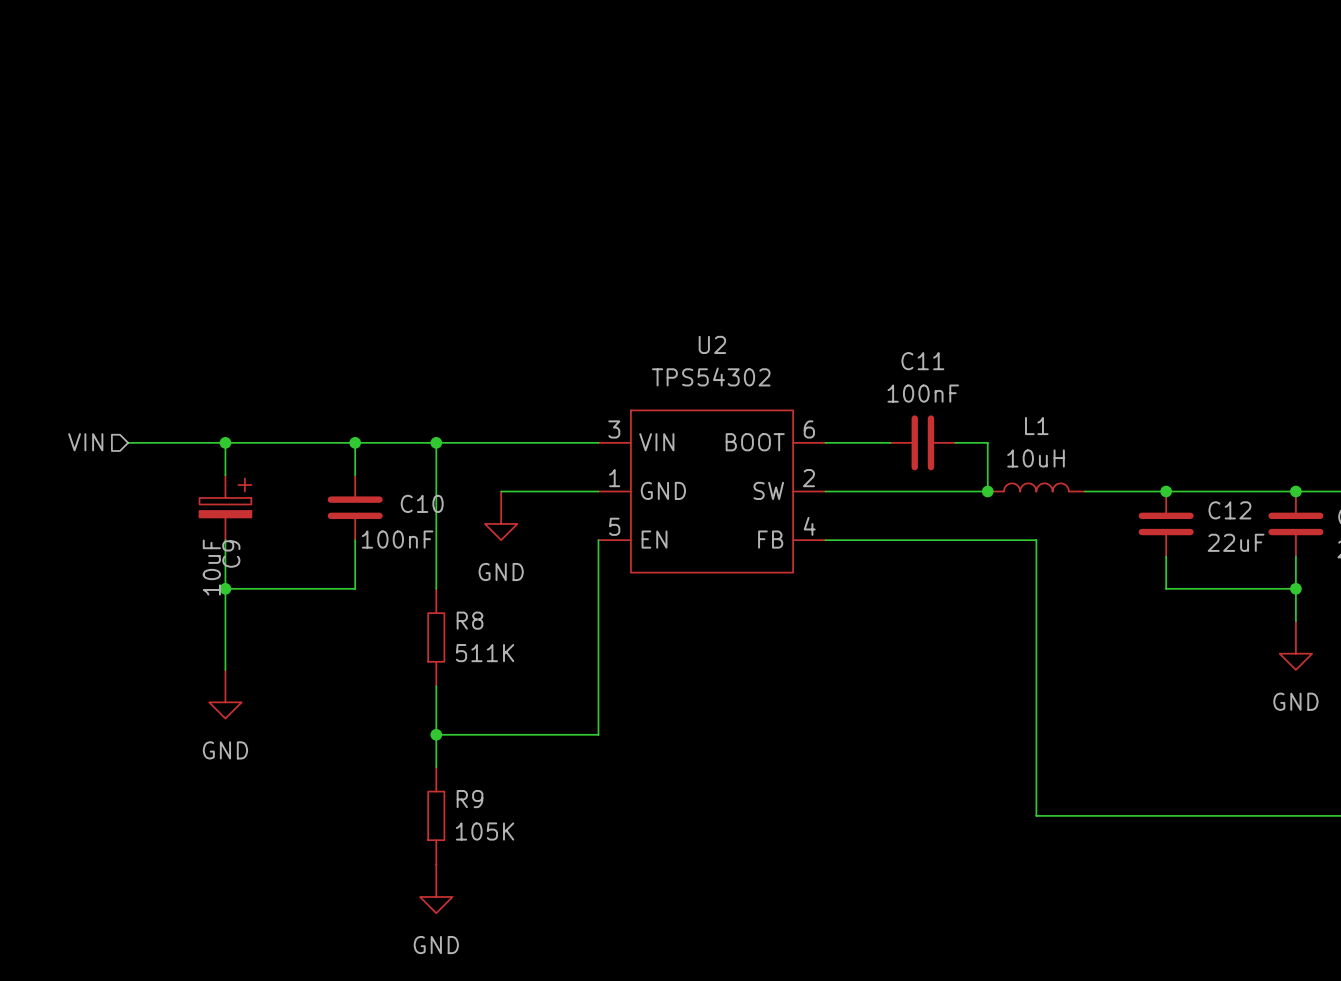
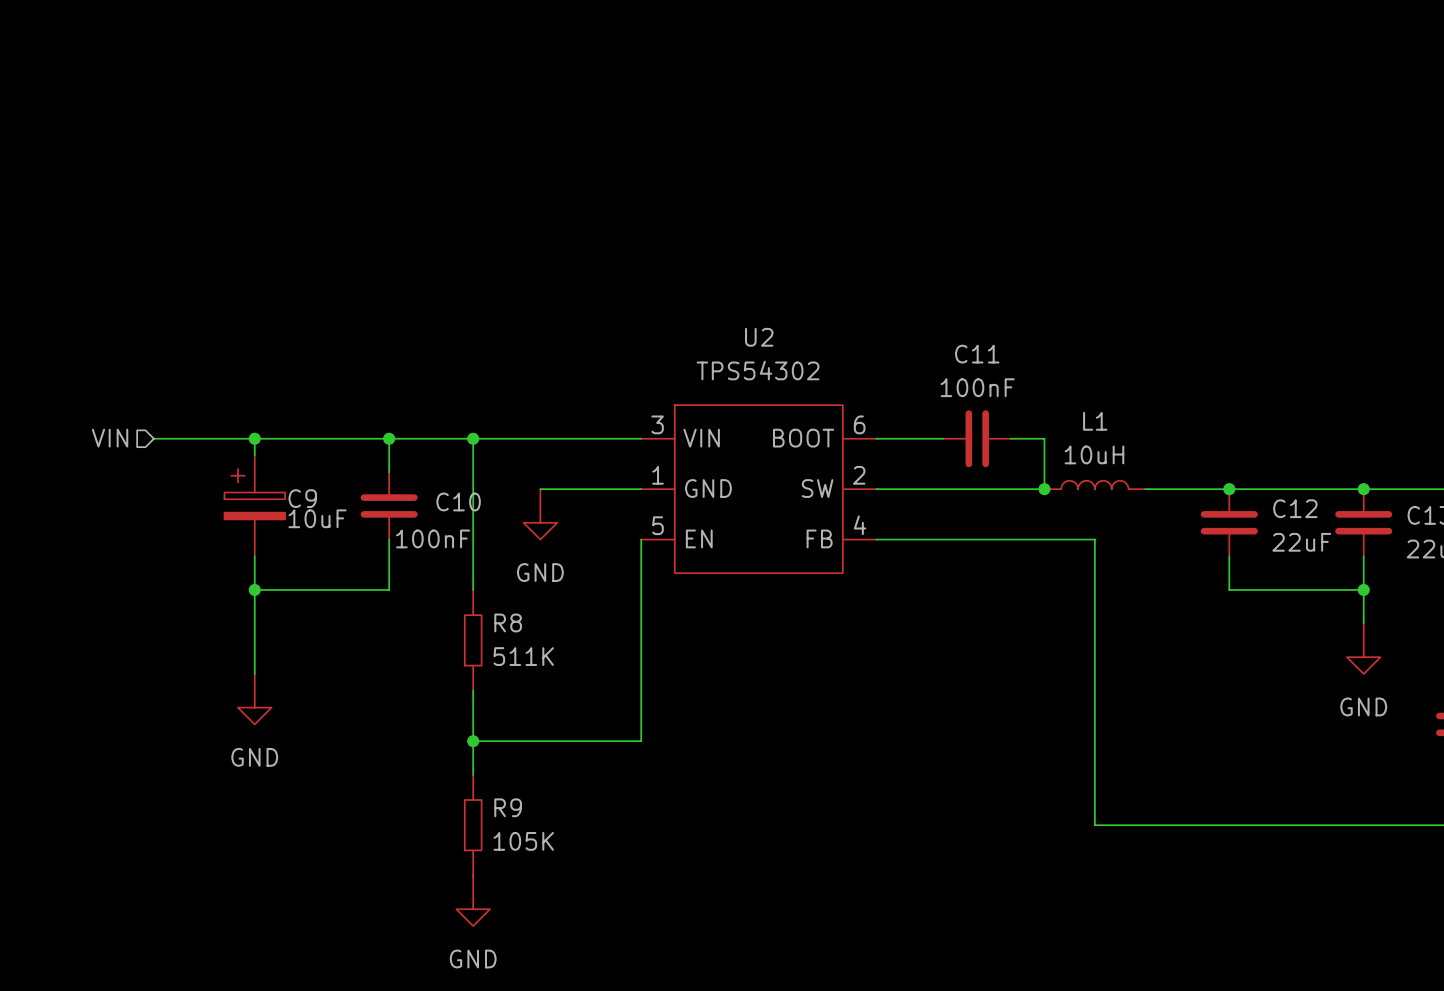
C9 symbol: [199, 475, 252, 541] -> [224, 455, 285, 557]
C9 name position: C9 (231, 554) -> C9 (302, 498)
C9 value position: 10uF (211, 567) -> 10uF (317, 518)

